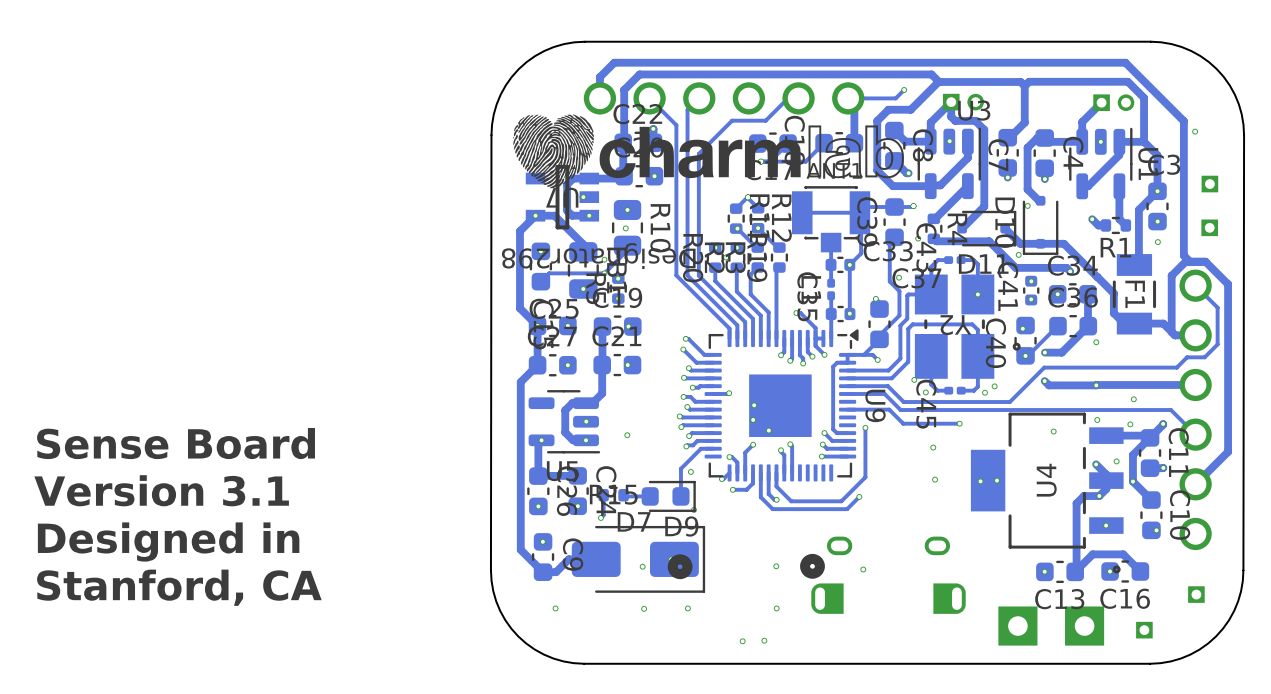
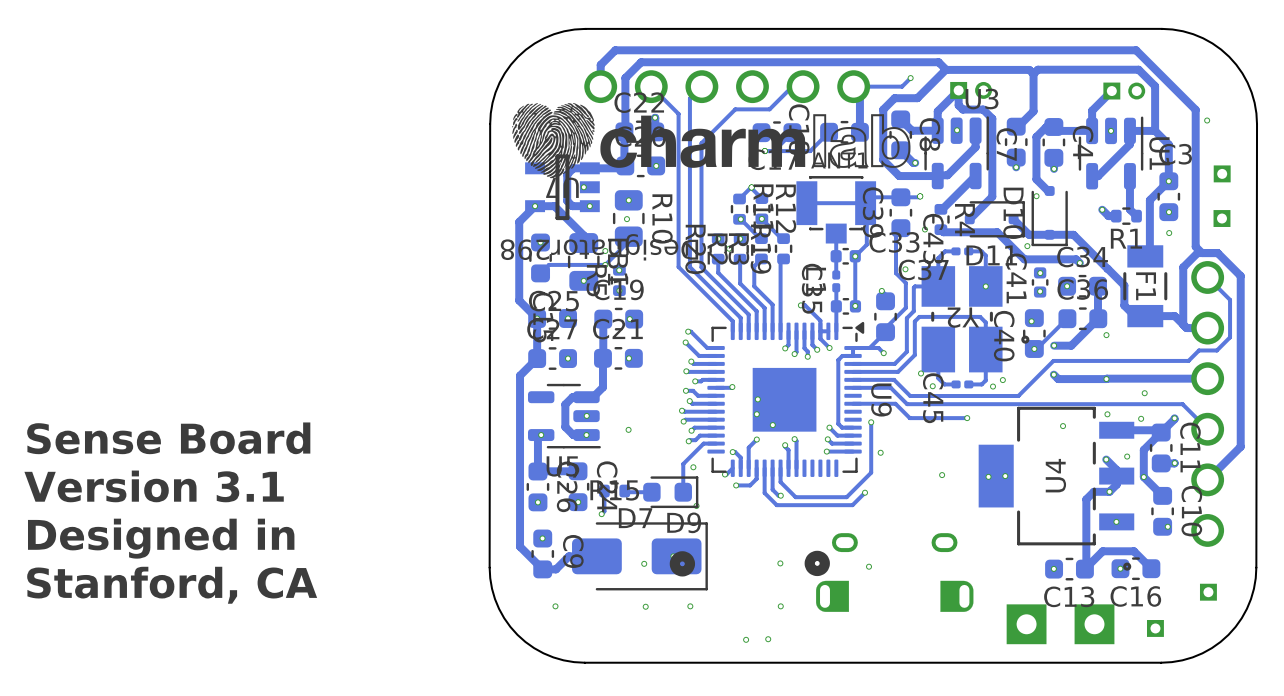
via position: (933, 447) -> (880, 452)

